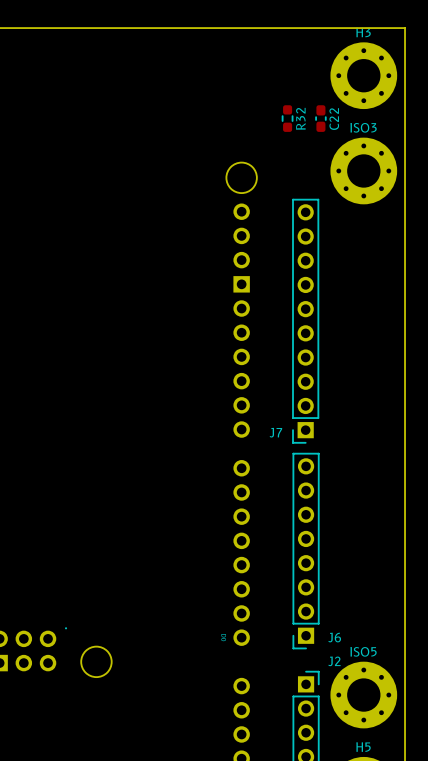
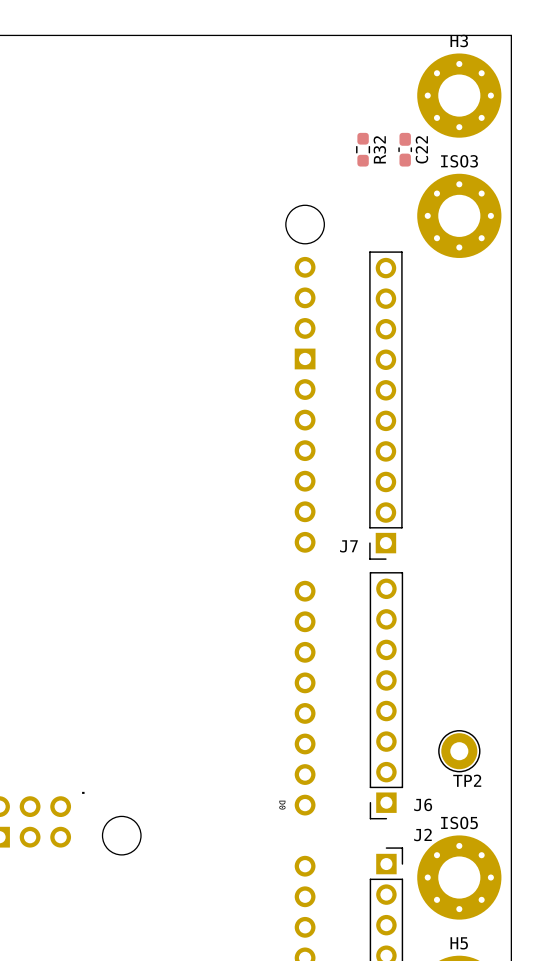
TP2: none -> (459, 751)

